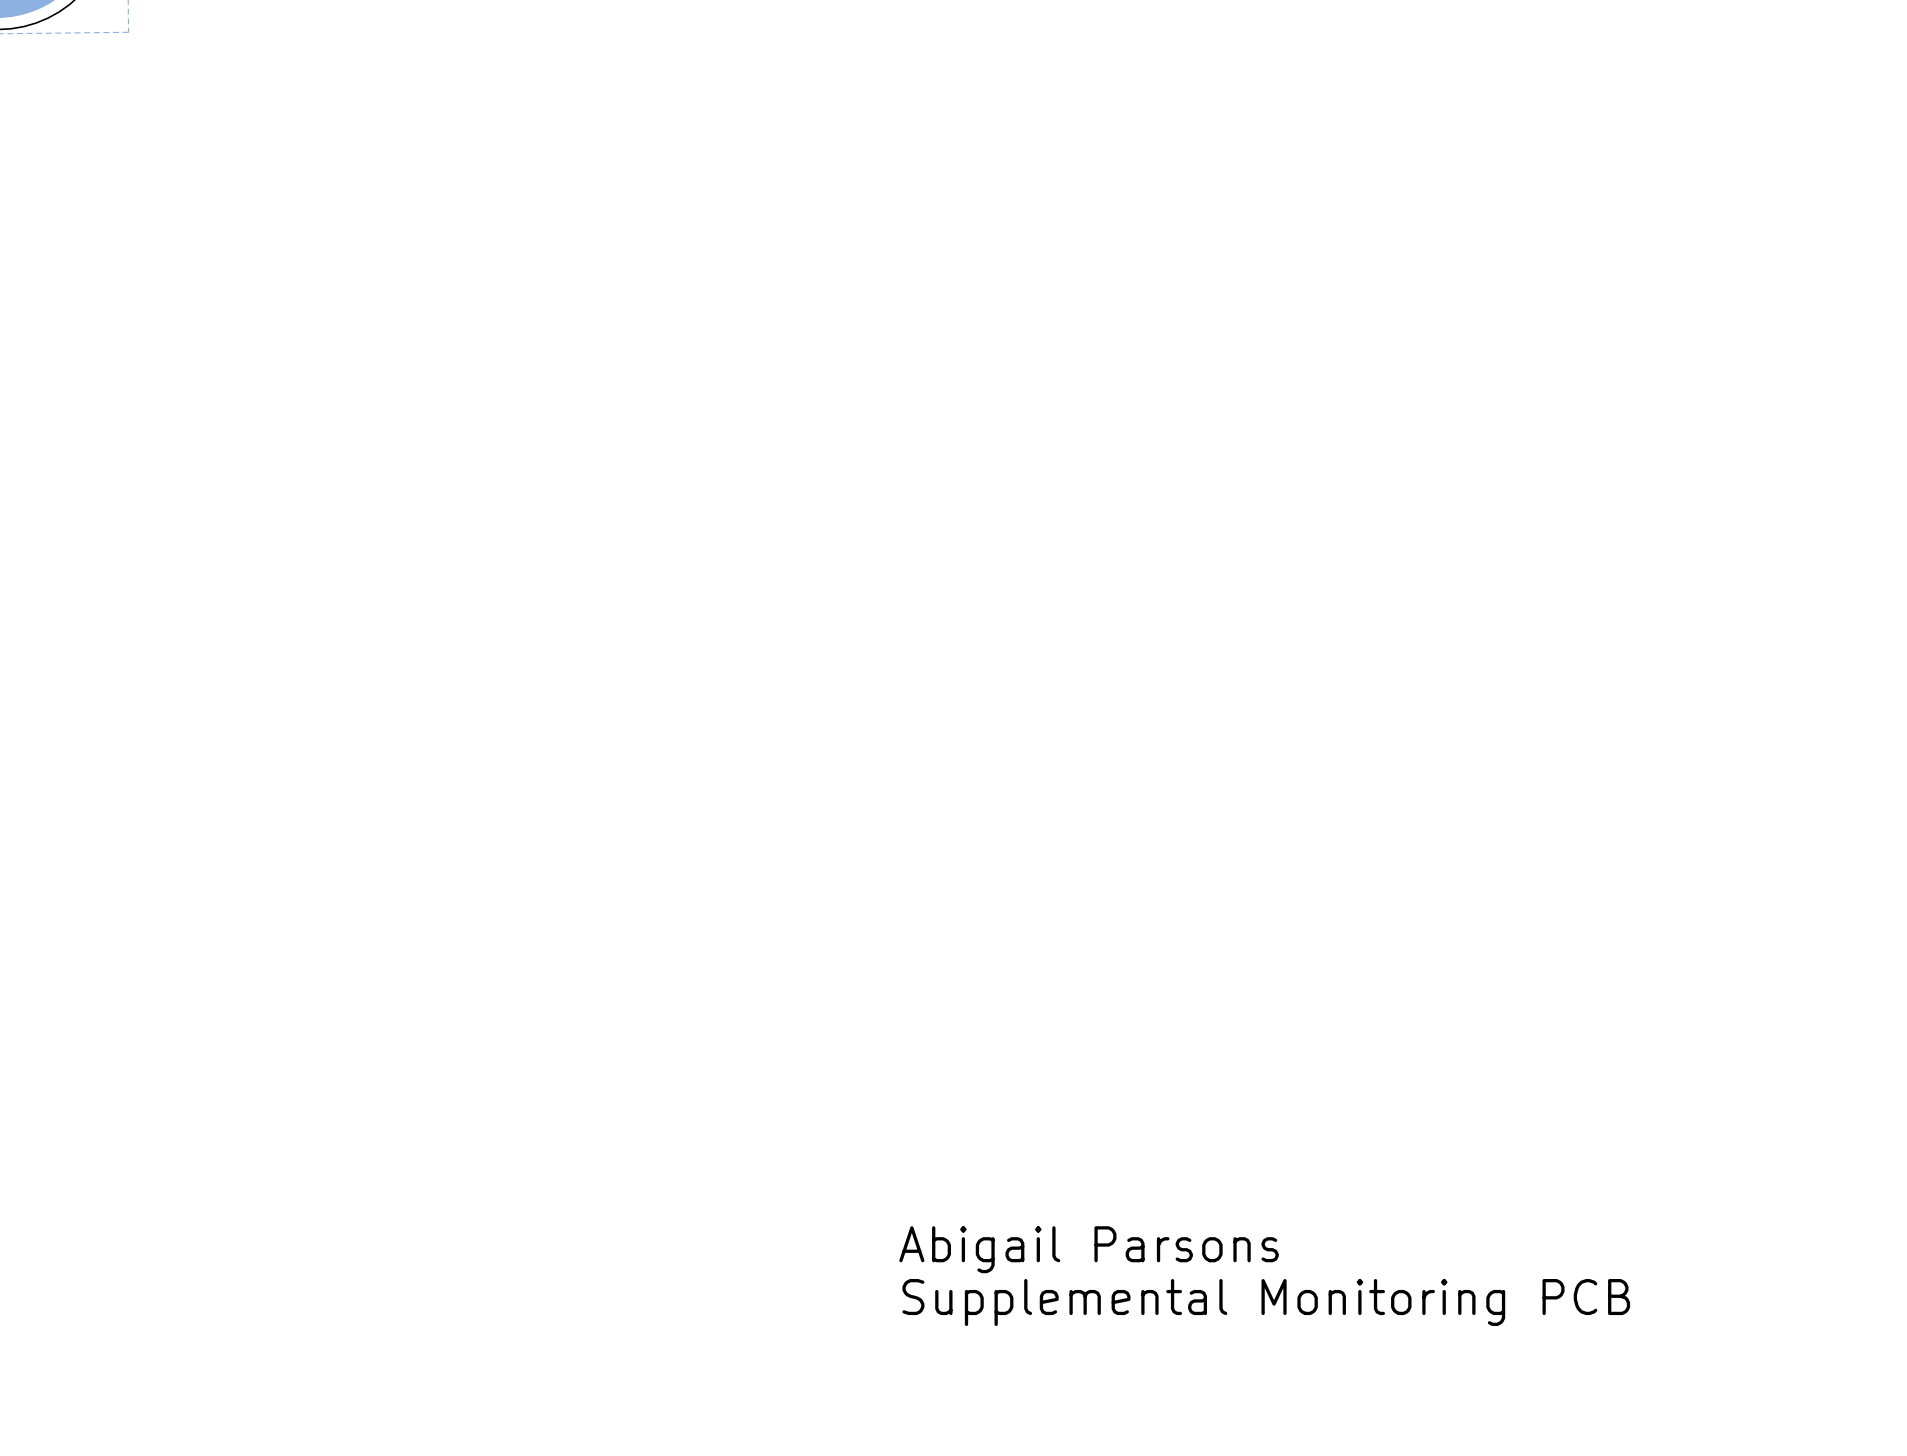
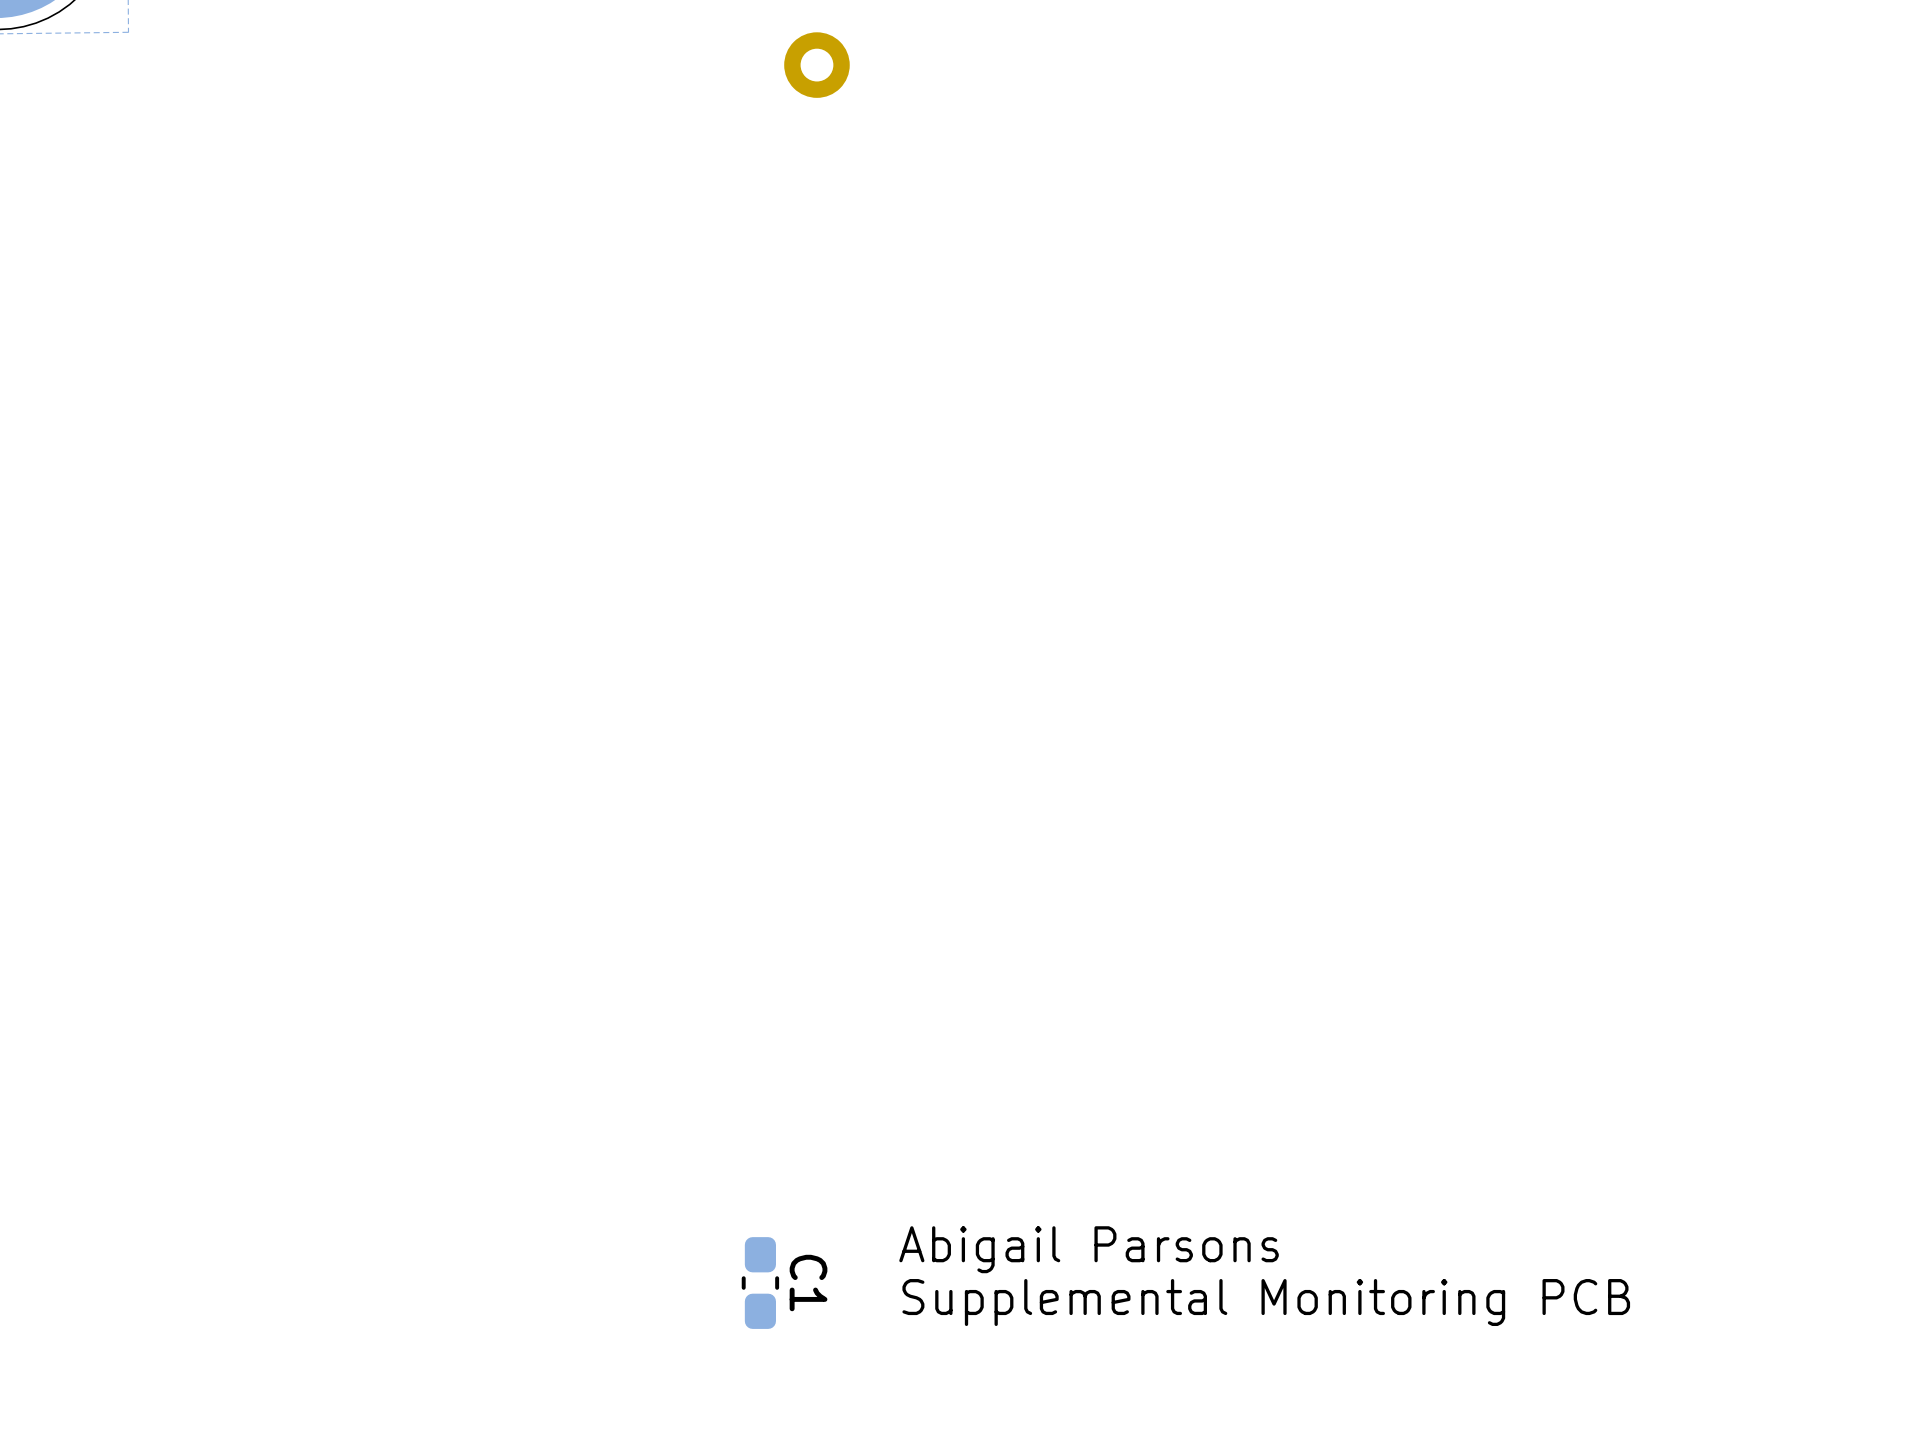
part: none -> (816, 65)
C1: none -> (760, 1283)

